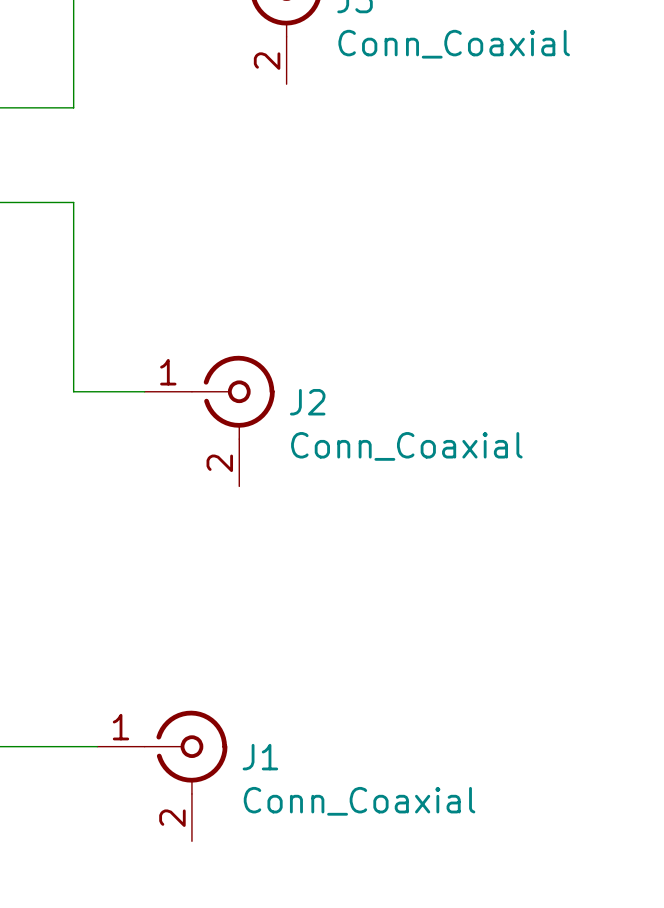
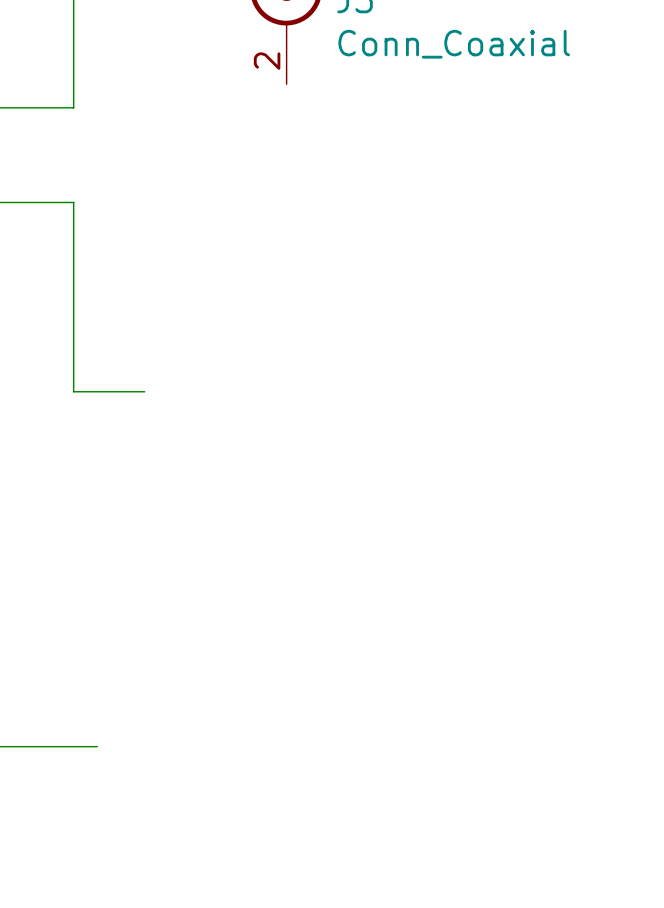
J2: Conn_Coaxial (209, 421) -> none
J1: Conn_Coaxial (162, 775) -> none

